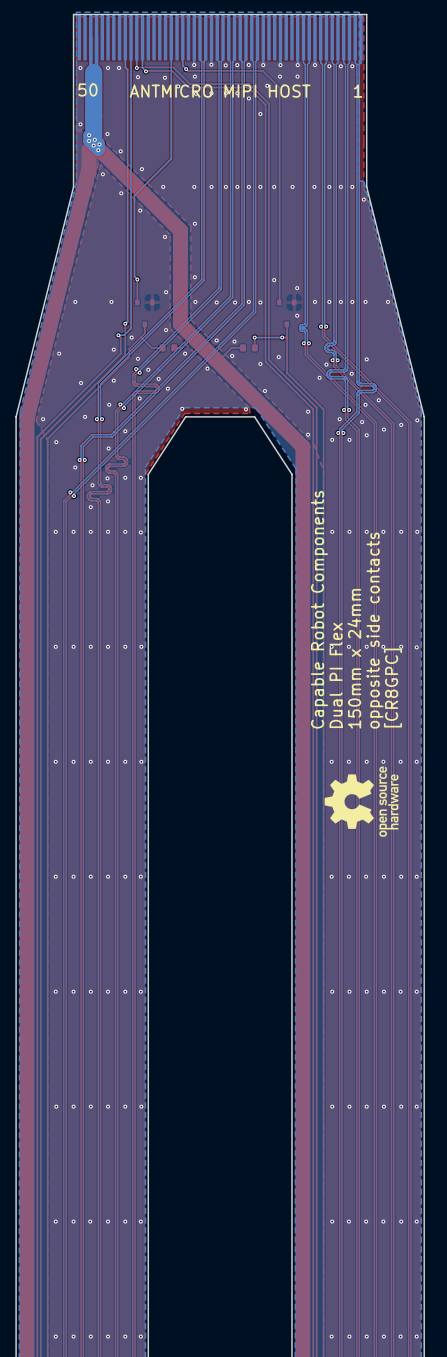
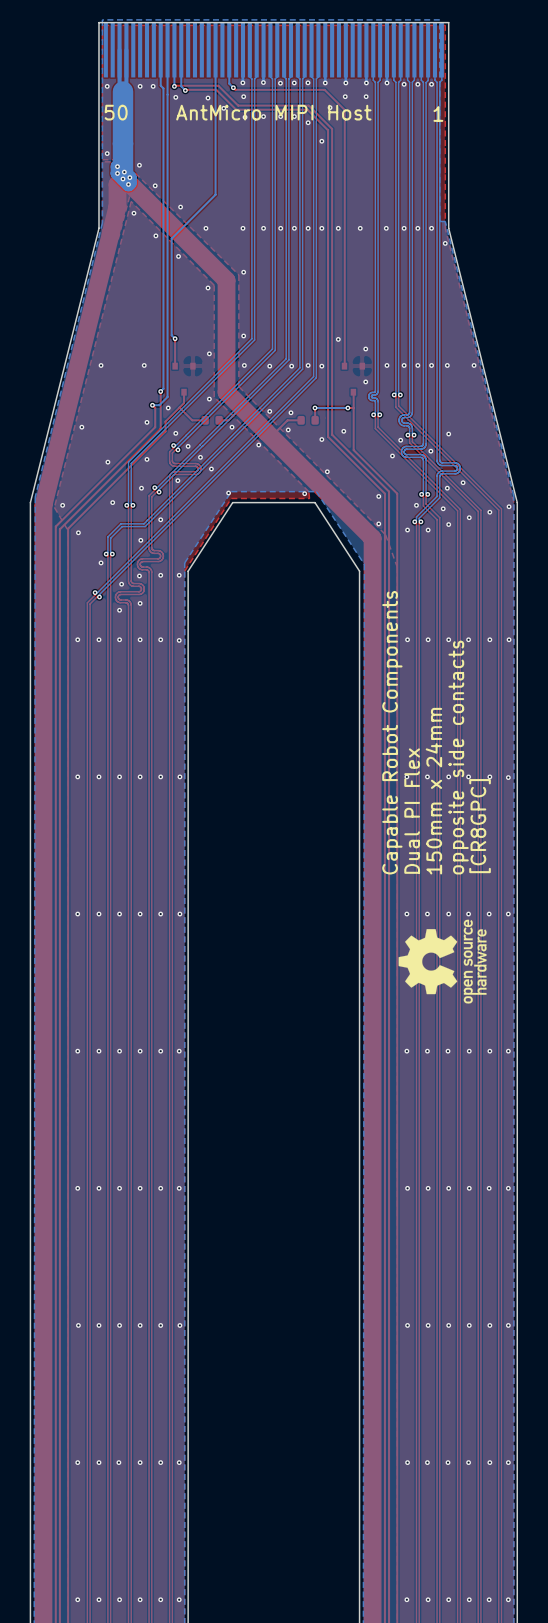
ANTMICRO MIPI HOST name: ANTMICRO MIPI HOST (220, 91) -> AntMicro MIPI Host (273, 112)

